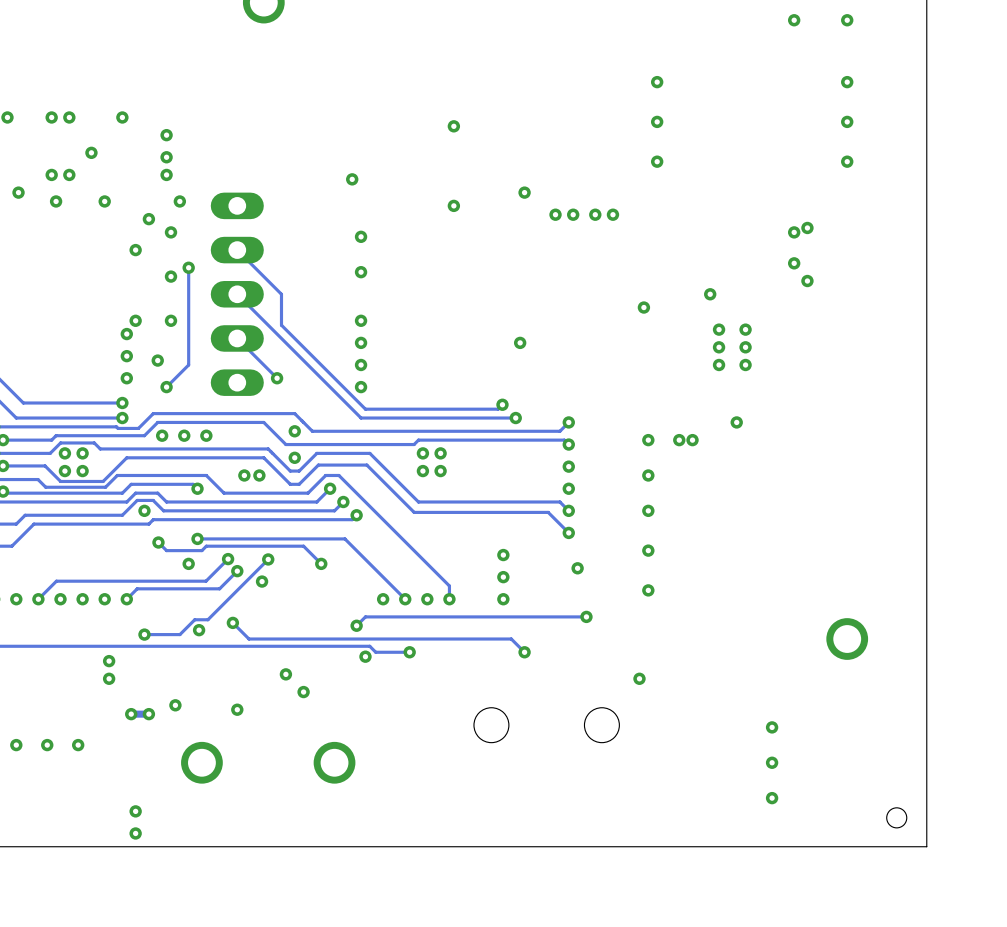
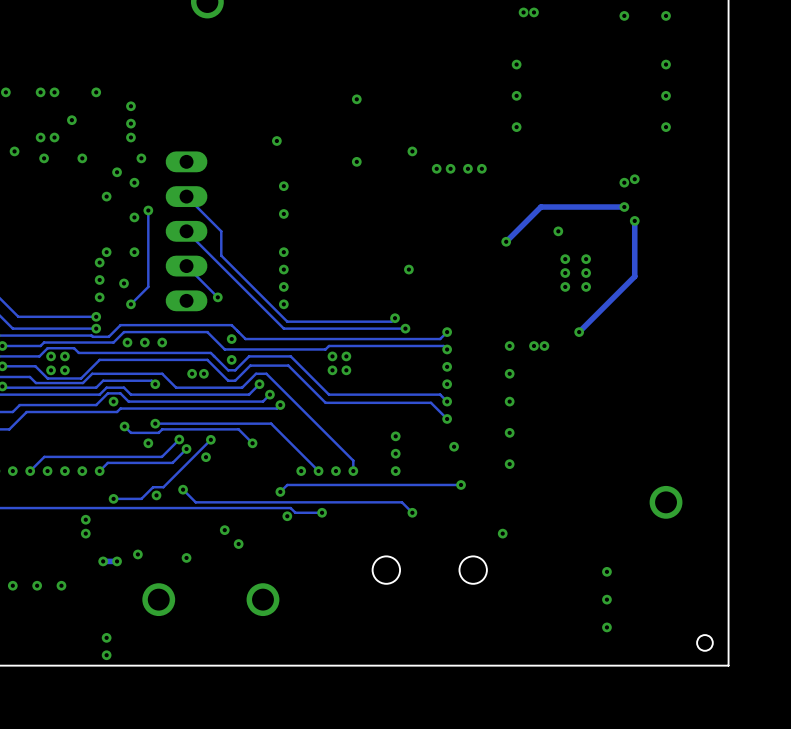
via: none -> (523, 12)
via: none -> (533, 12)
track: none -> (624, 207) (540, 207) (506, 241)
track: none -> (634, 220) (634, 276) (579, 332)

